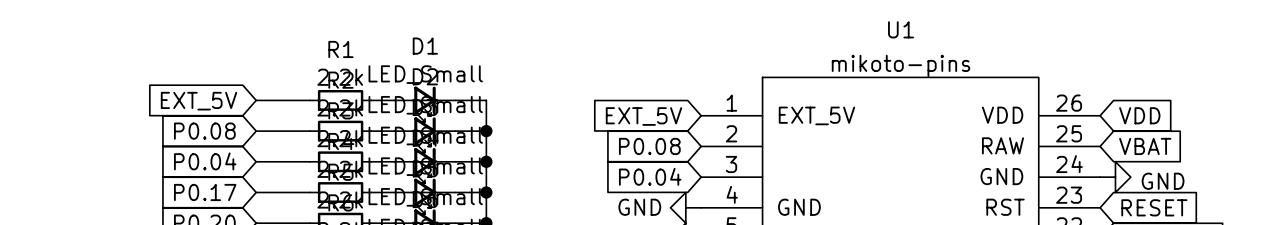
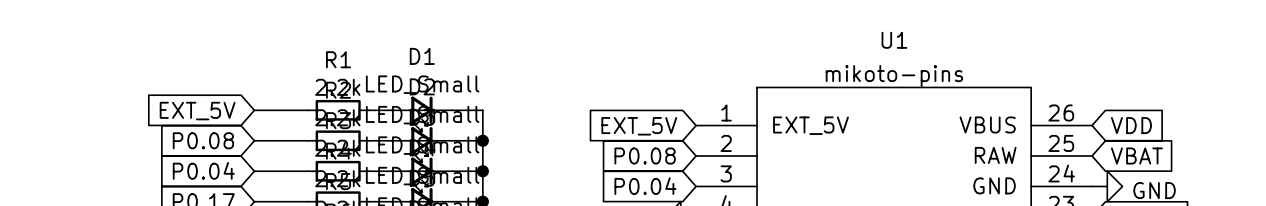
U1 pin name: VDD (1002, 115) -> VBUS (987, 124)

